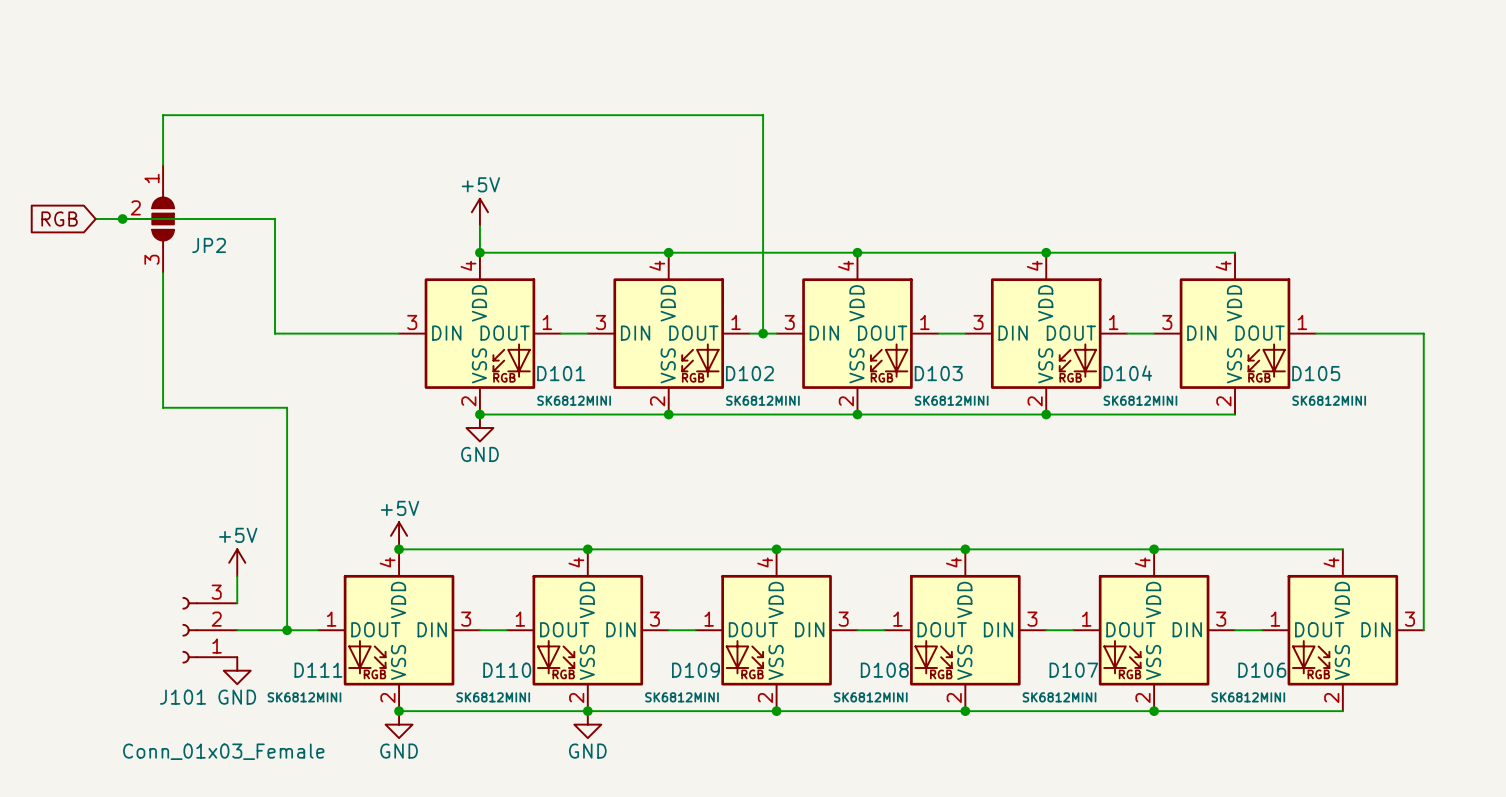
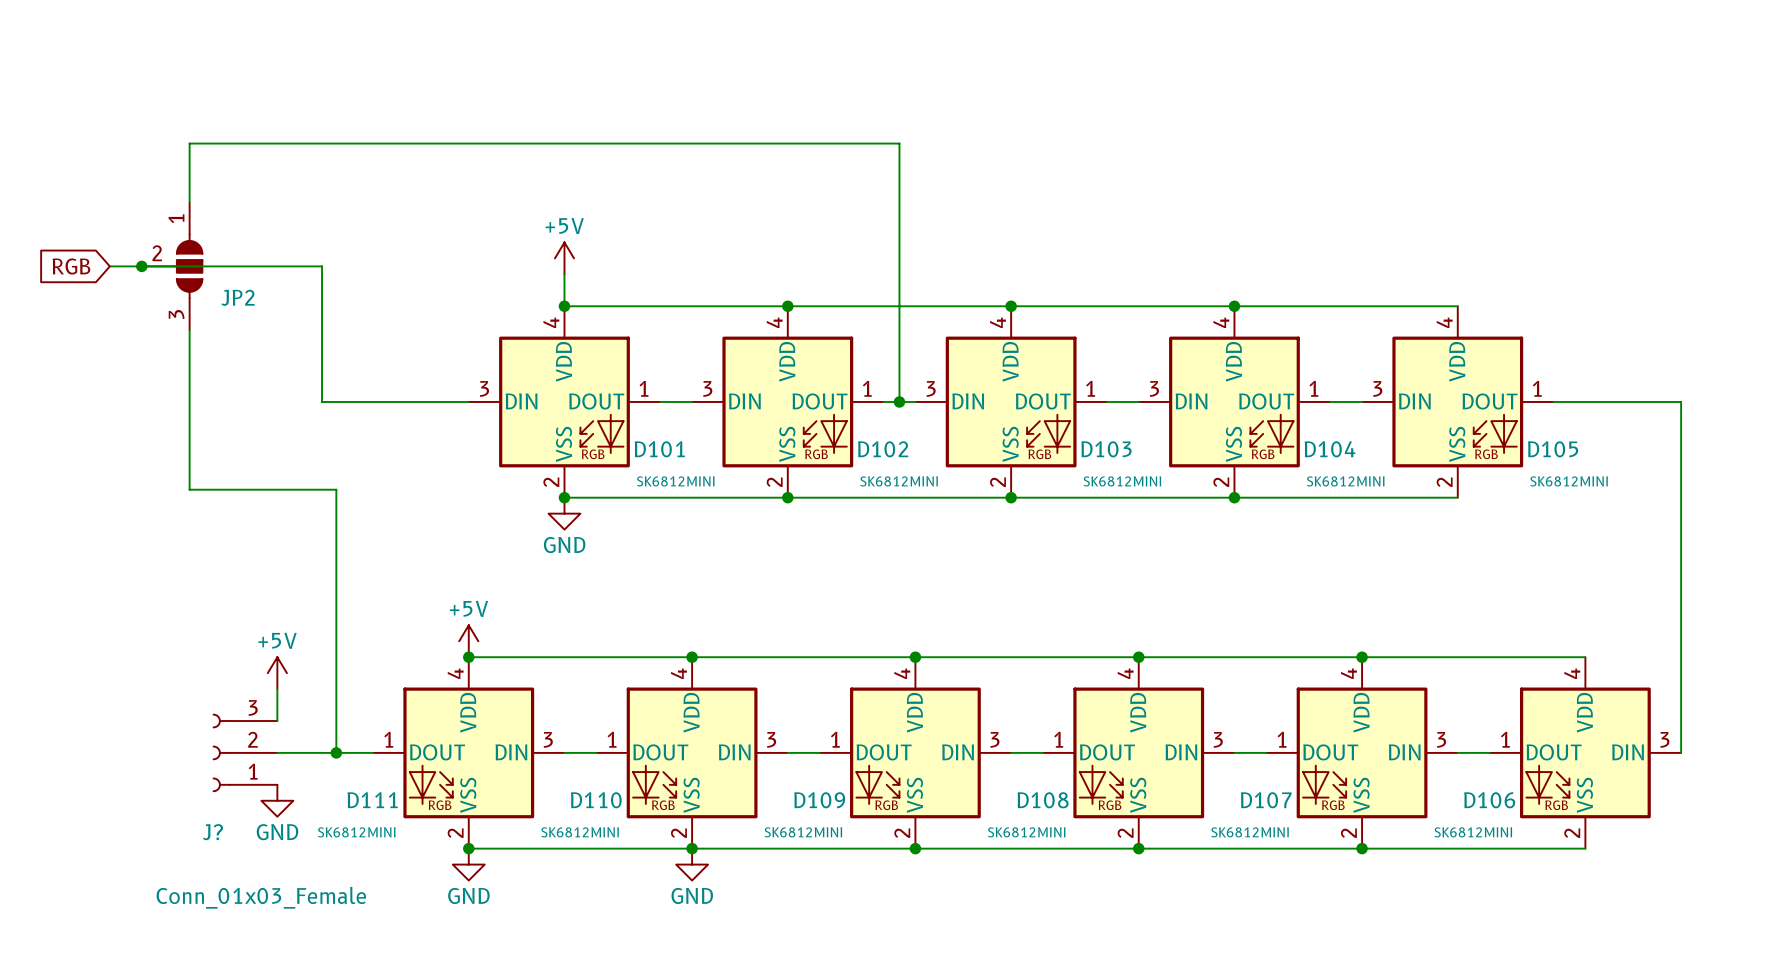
J101 name: J101 (182, 697) -> J? (213, 832)

